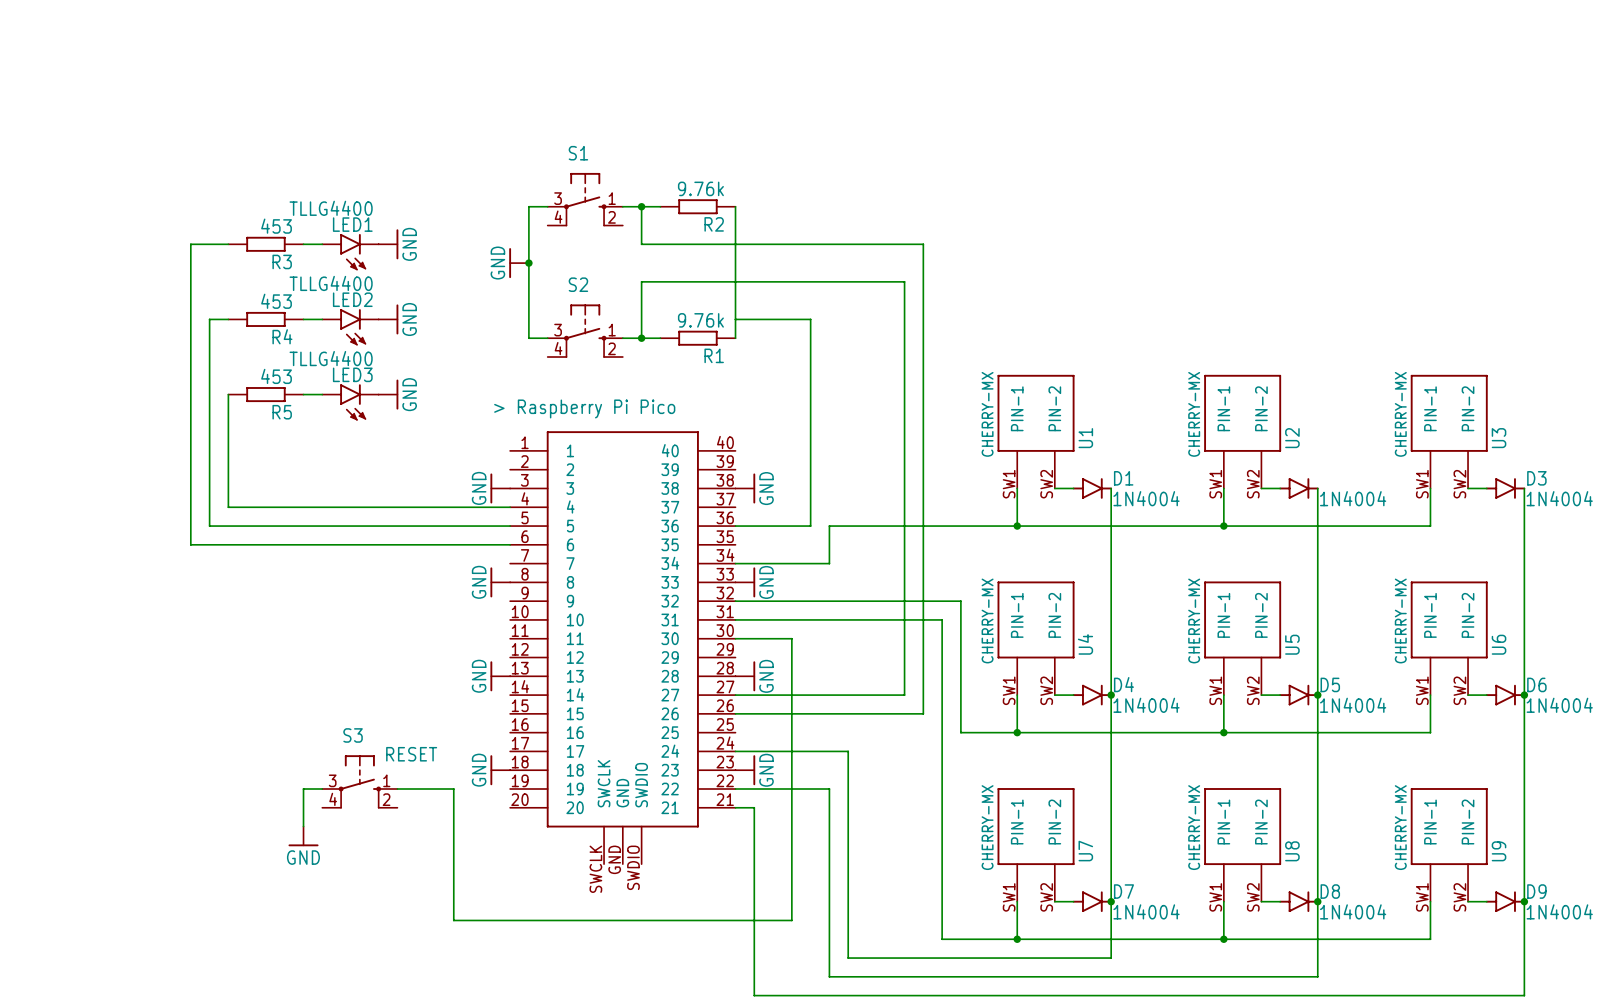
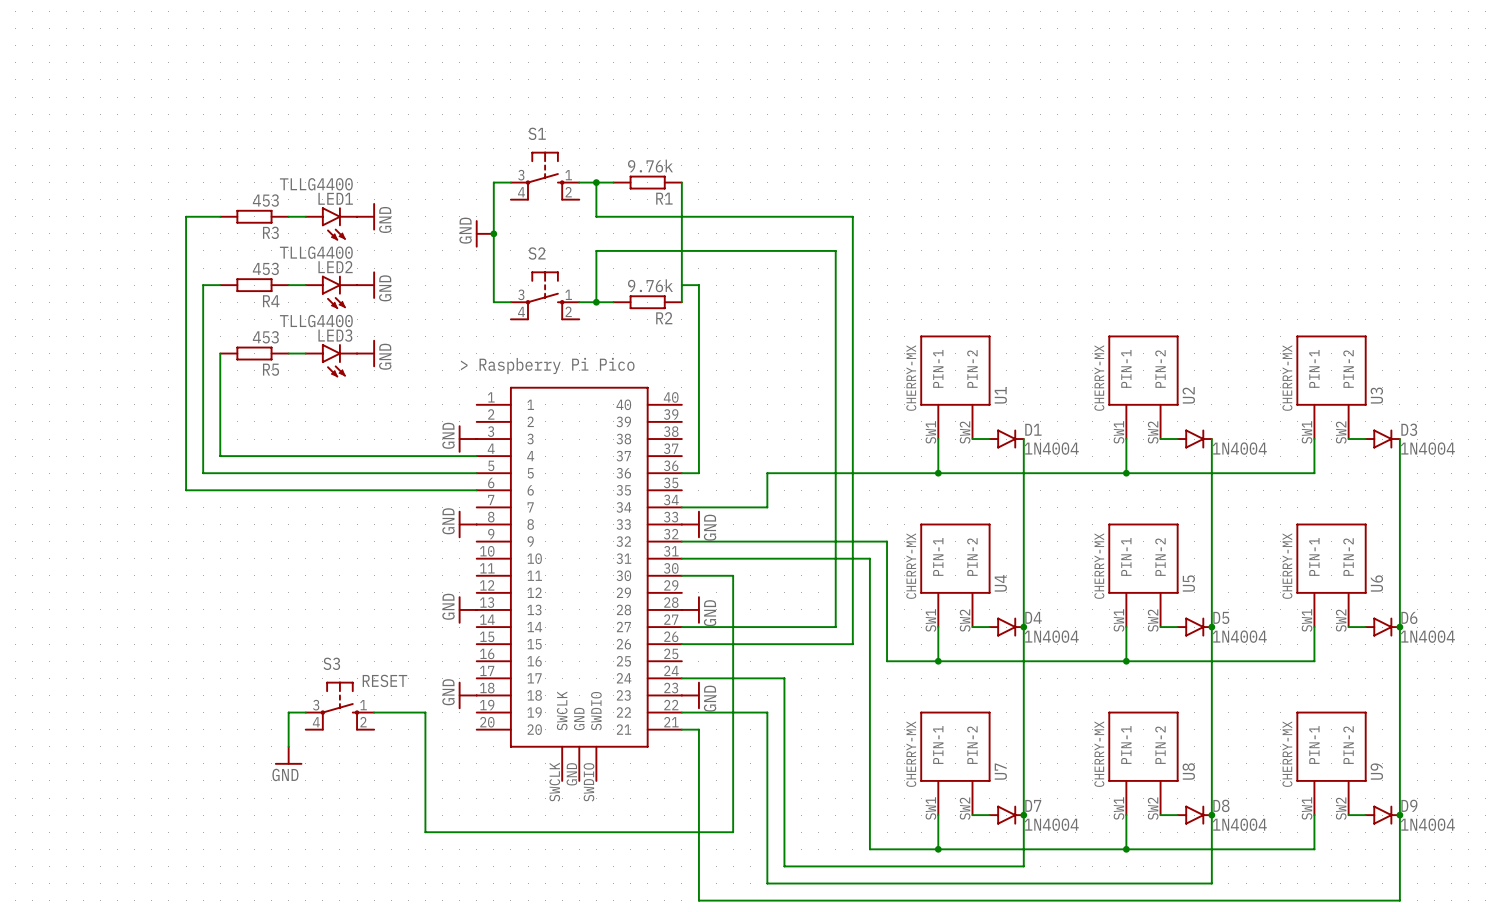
R2 name: R2 (714, 224) -> R1 (664, 198)
wire: (754, 319) (810, 319) (810, 526) (754, 526) -> (698, 285) (698, 473)
R1 name: R1 (714, 355) -> R2 (664, 318)
power symbol: GND (745, 488) -> none

